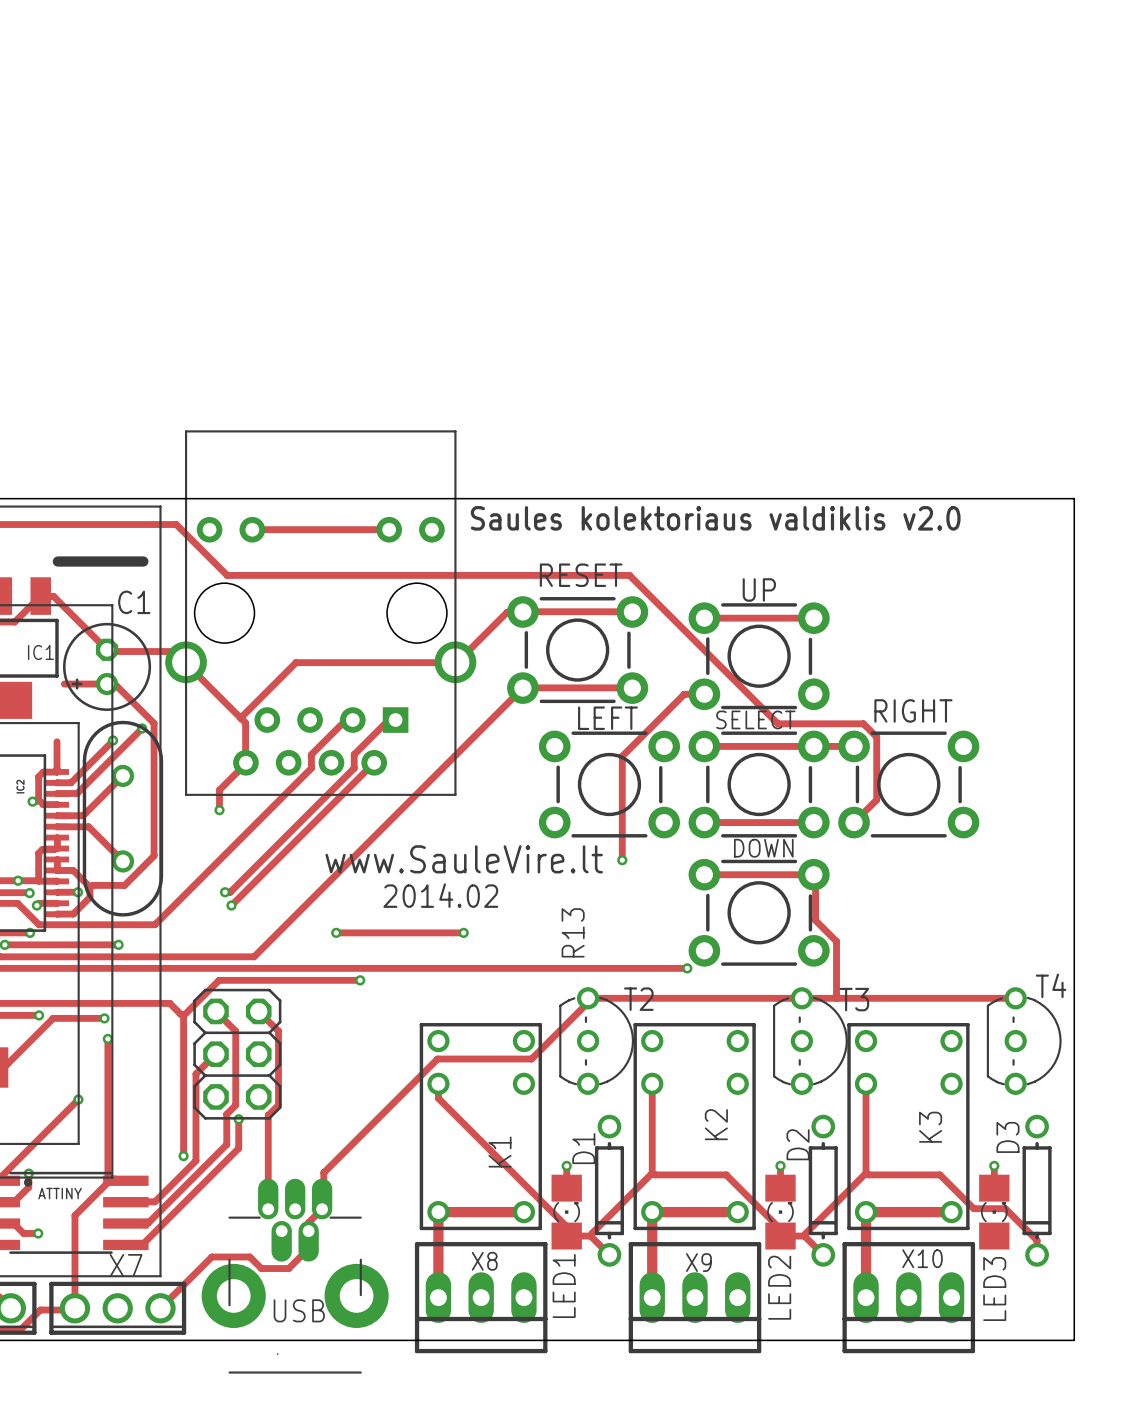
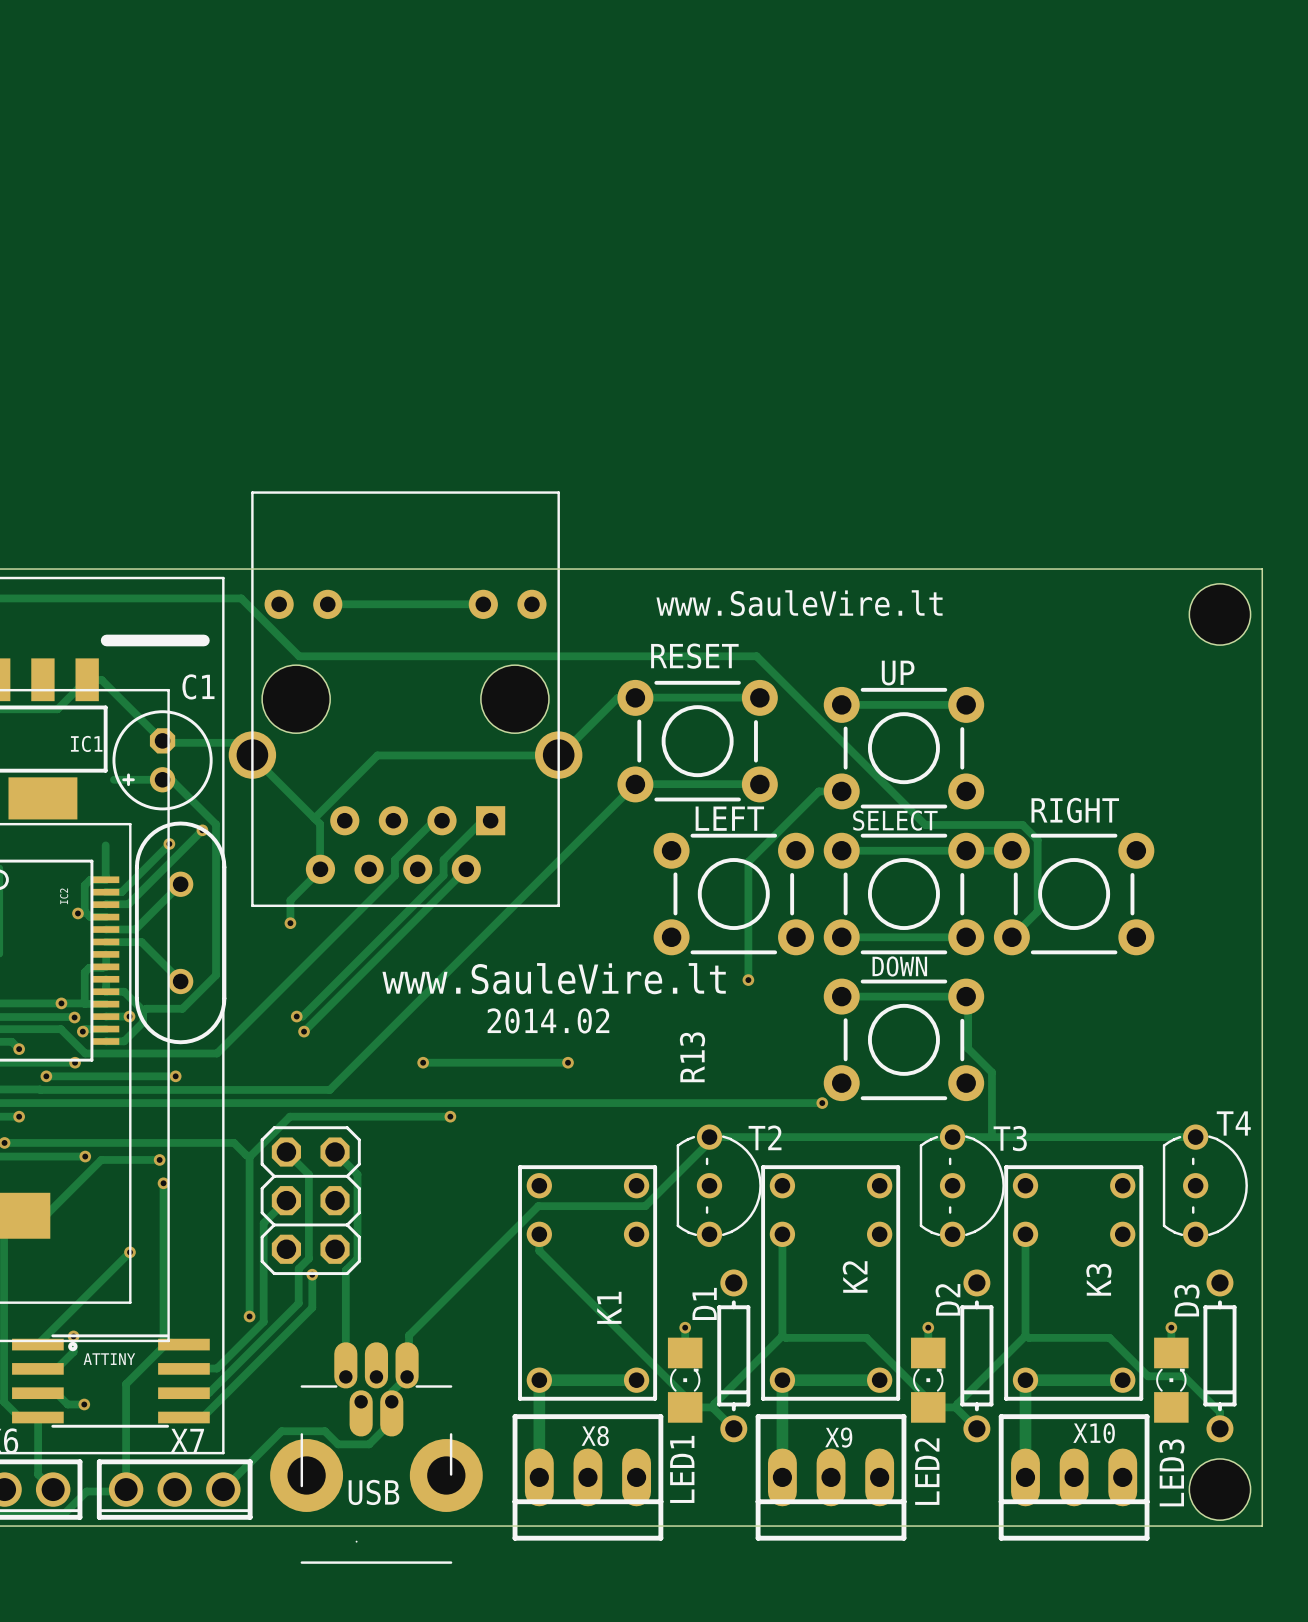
text: Saules kolektoriaus valdiklis v2.0 (715, 518) -> none
text: none -> www.SauleVire.lt (799, 603)
hole: none -> (1219, 614)
hole: none -> (1219, 1489)

